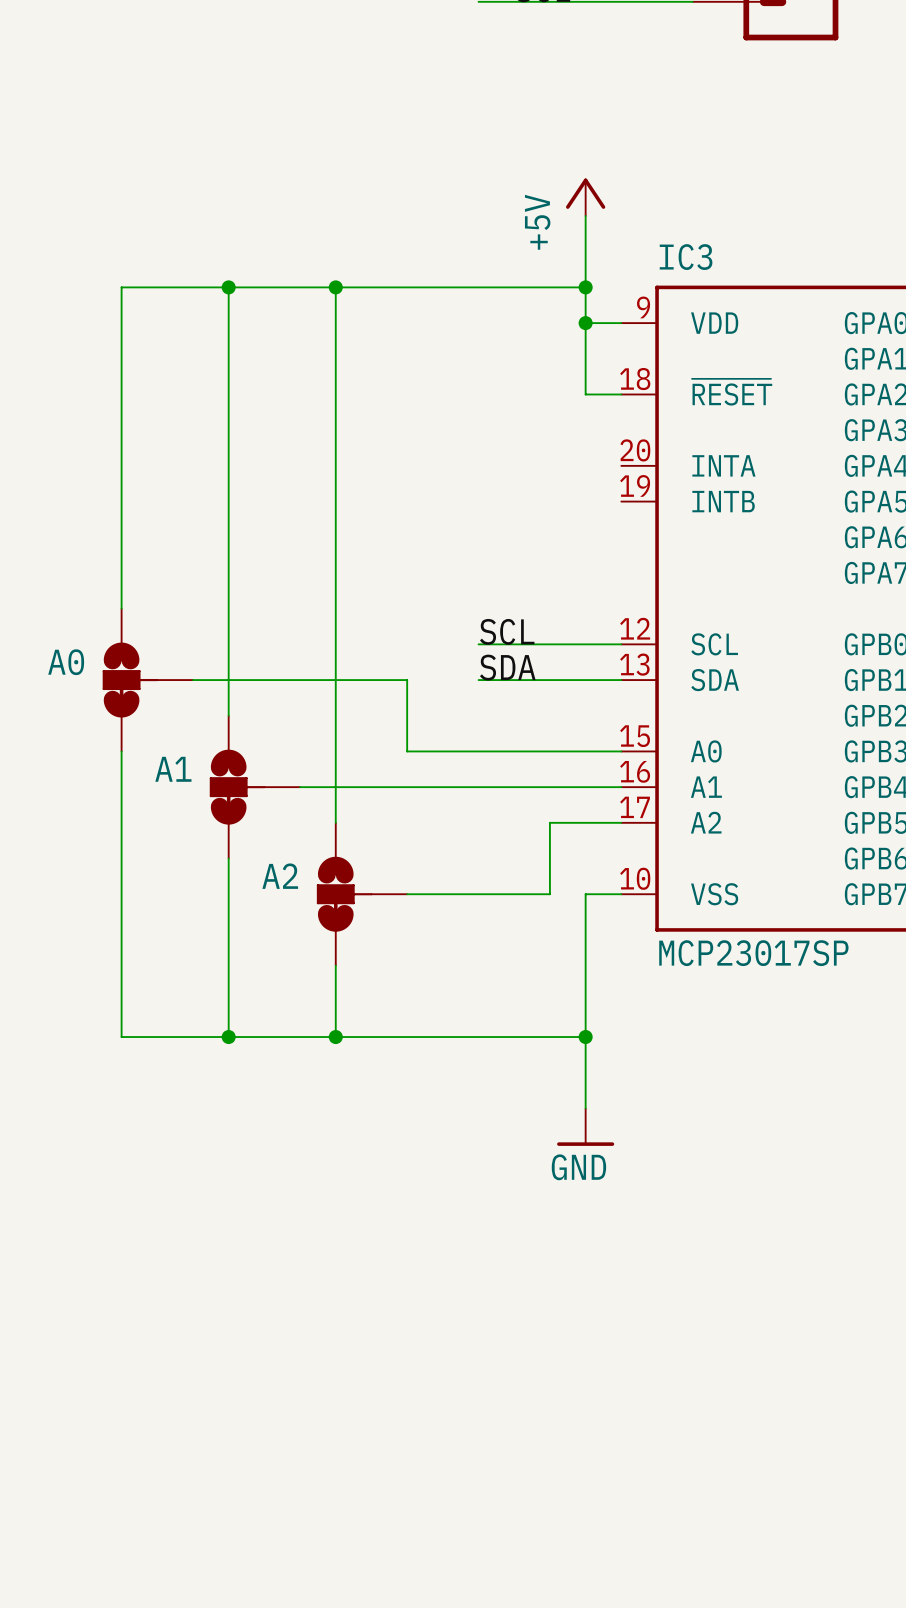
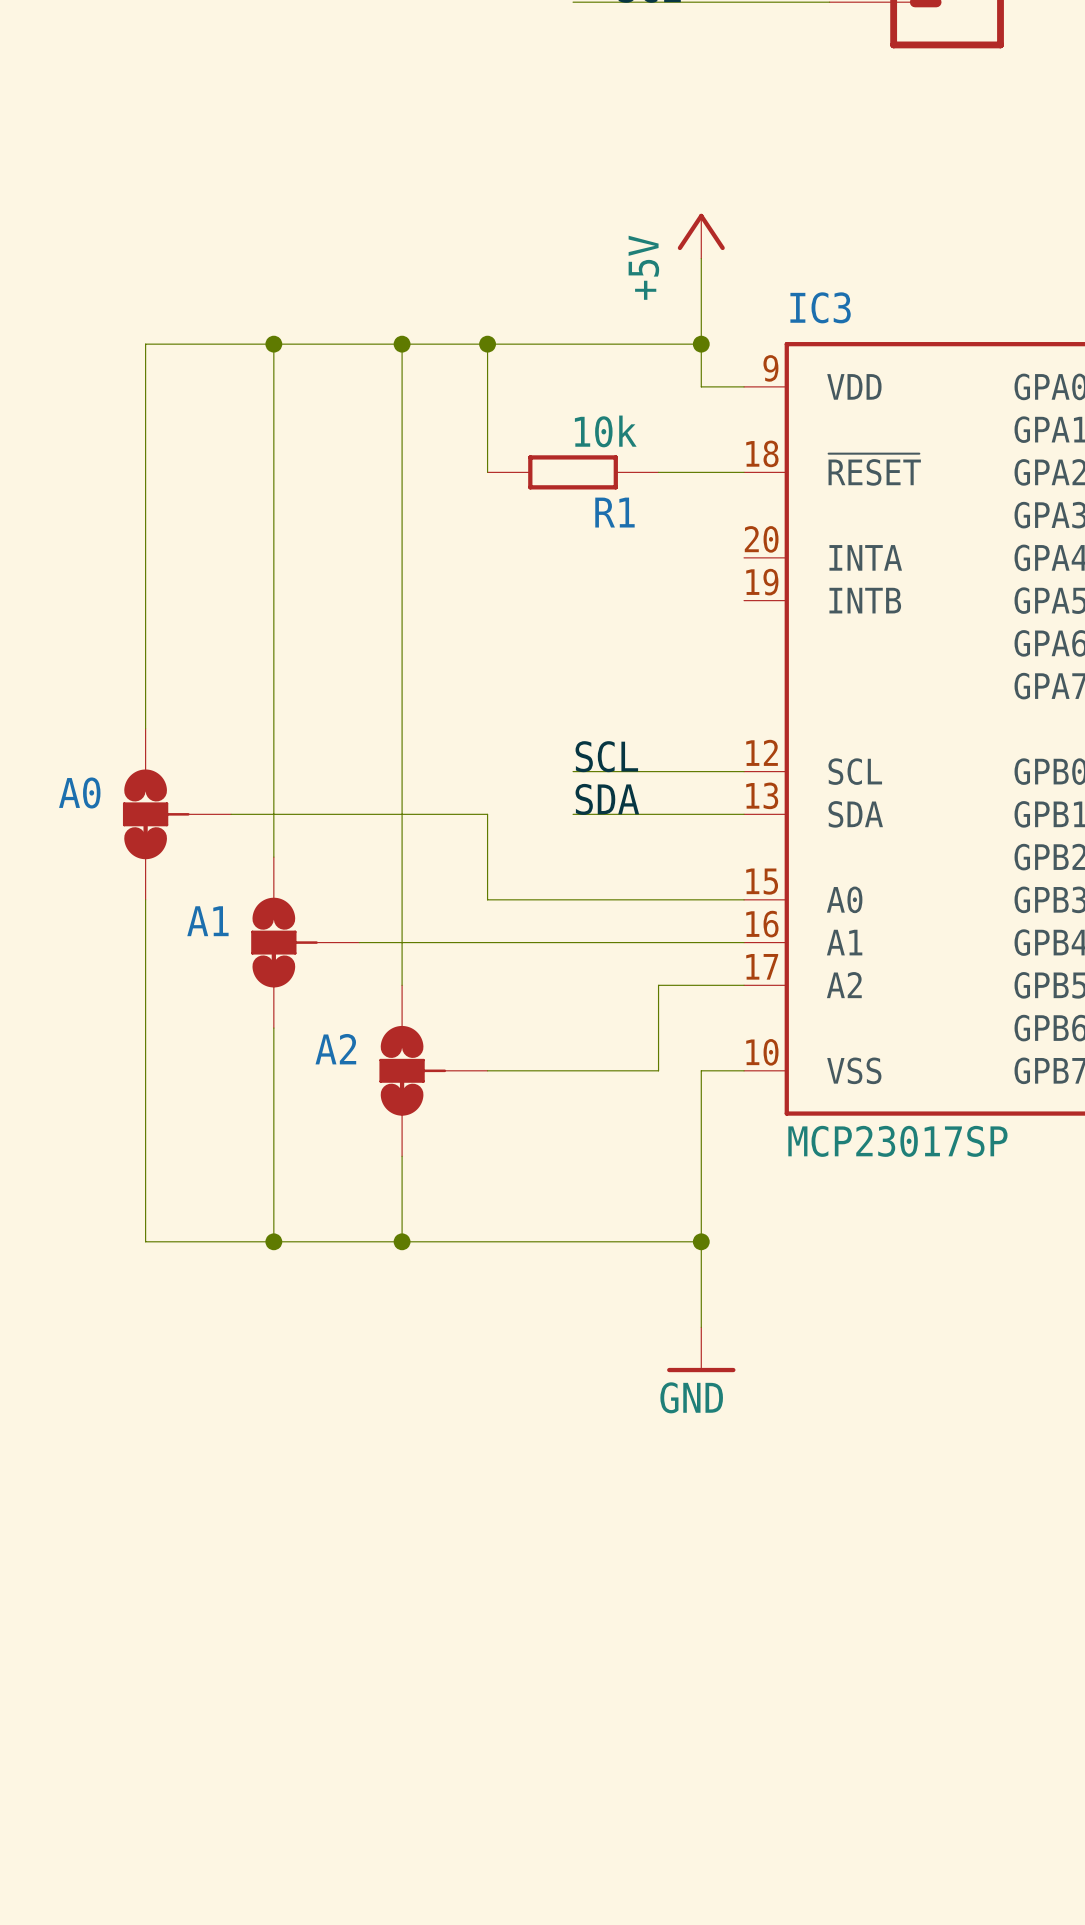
wire: none -> (487, 344) (487, 472)
junction: none -> (487, 344)
wire: (585, 323) (585, 394) -> (658, 472) (701, 472)
junction: (585, 323) -> none
R1: none -> 10k (573, 472)

